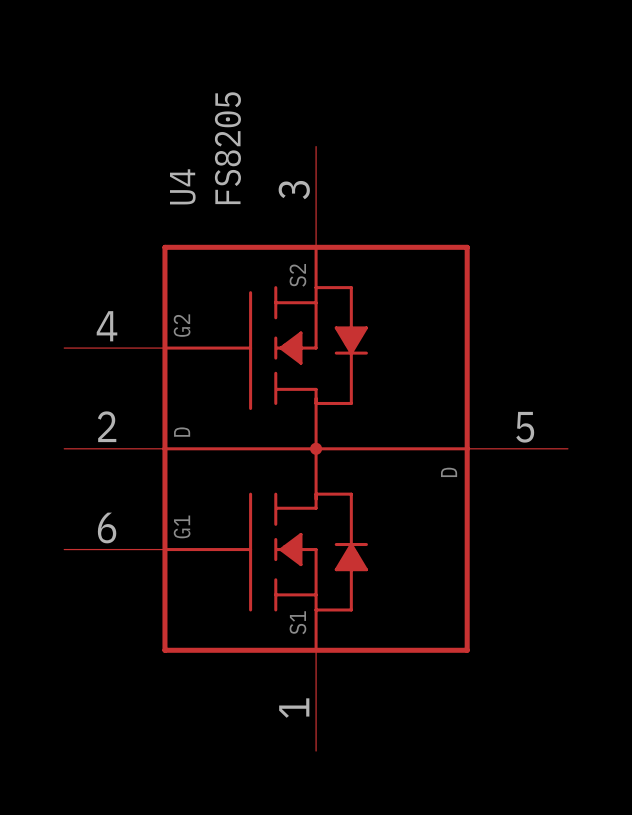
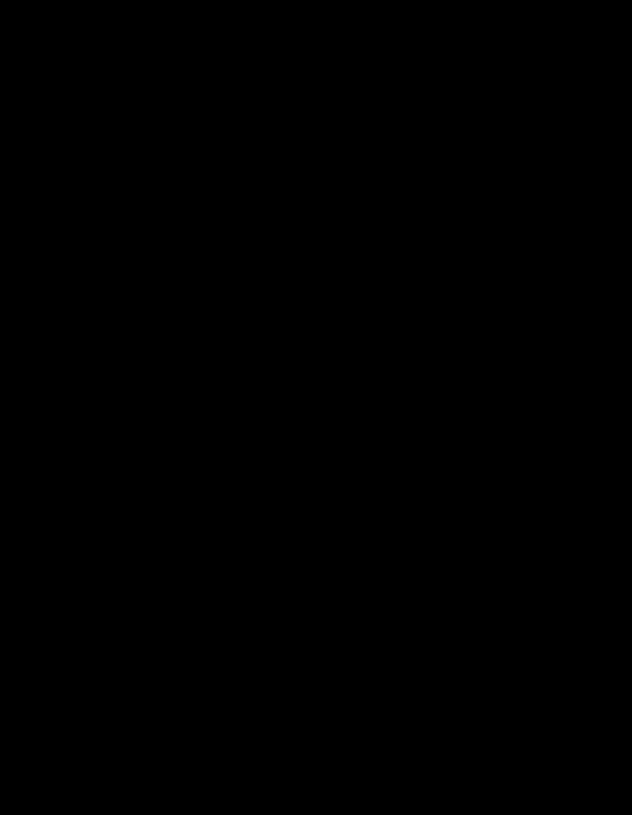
U4: FS8205 (316, 448) -> none

